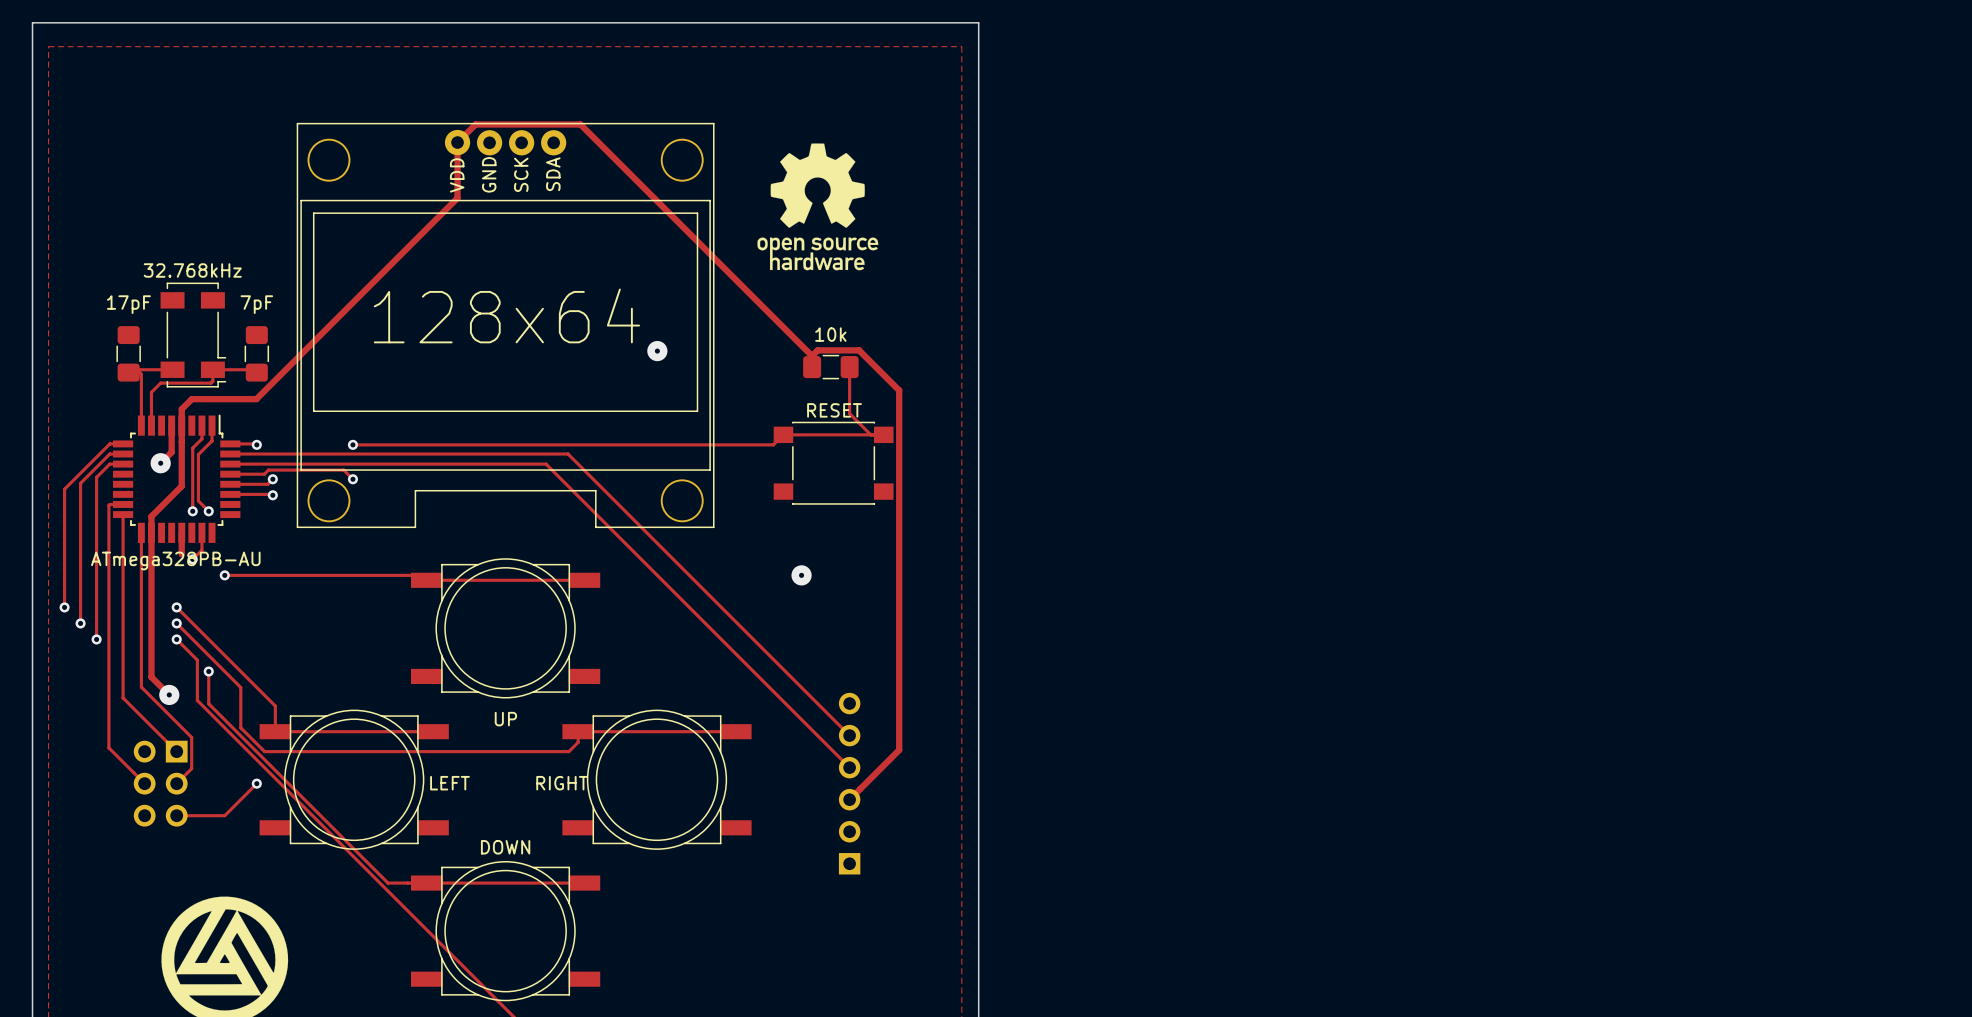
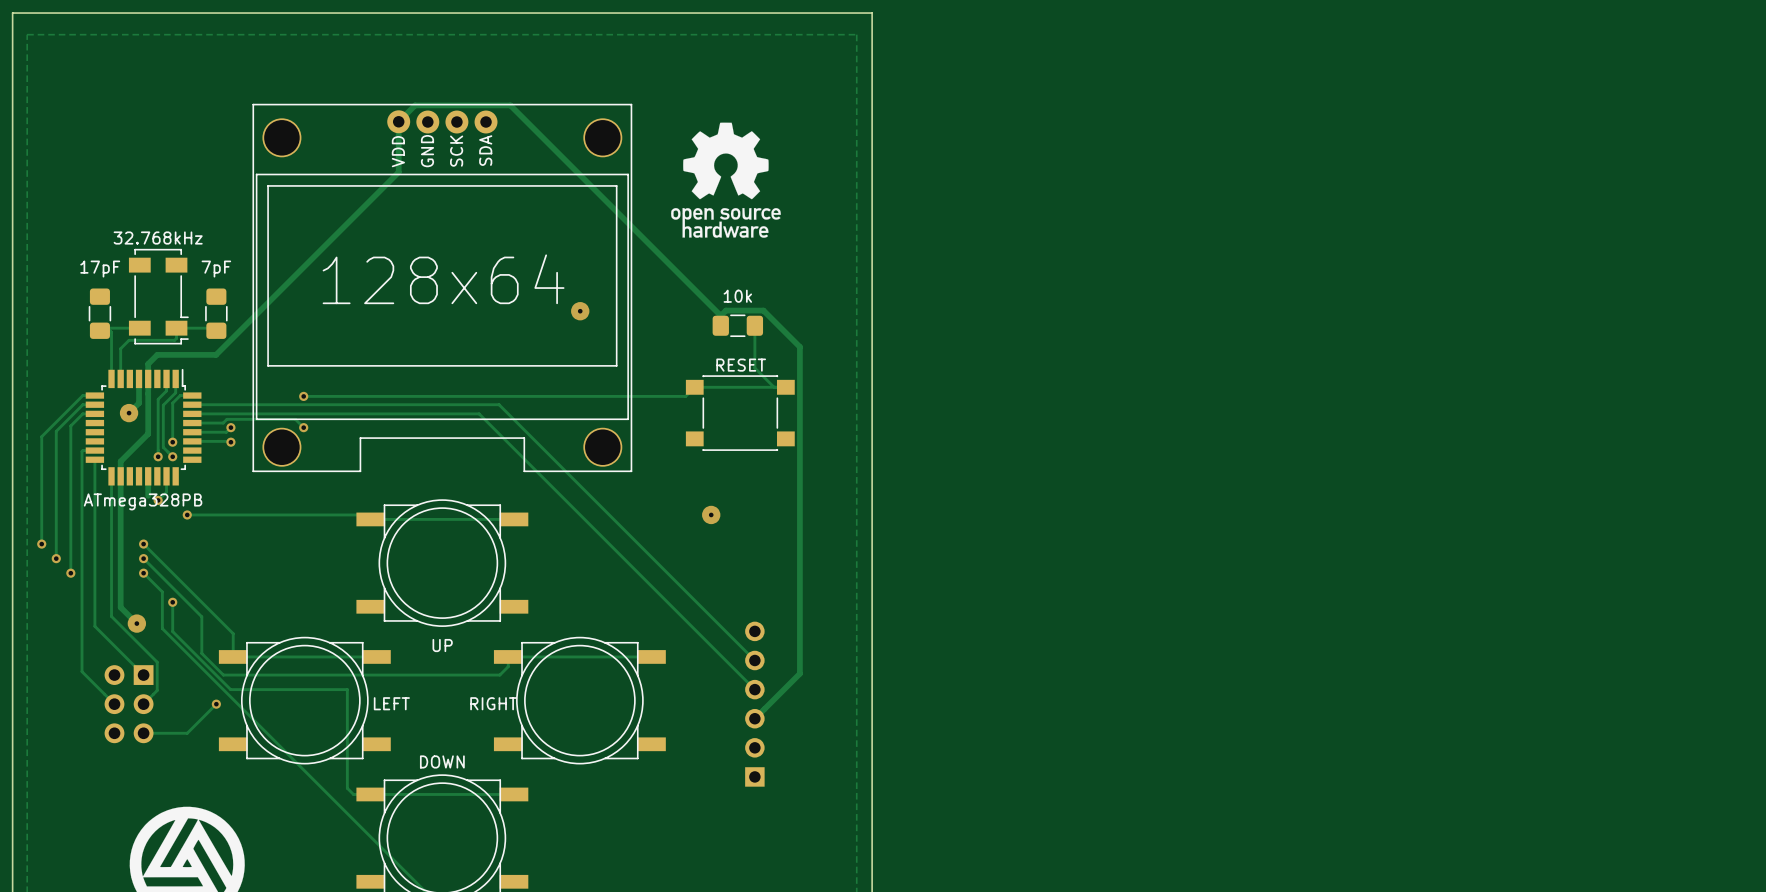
track: (230, 443) (256, 444) -> (192, 395) (180, 395) (172, 403) (172, 442)
via position: (256, 444) -> (172, 442)
part value: ATmega328PB-AU (175, 560) -> ATmega328PB (143, 501)
track: (272, 767) (388, 883) (407, 883) -> (230, 689) (347, 689) (347, 788) (353, 794)

